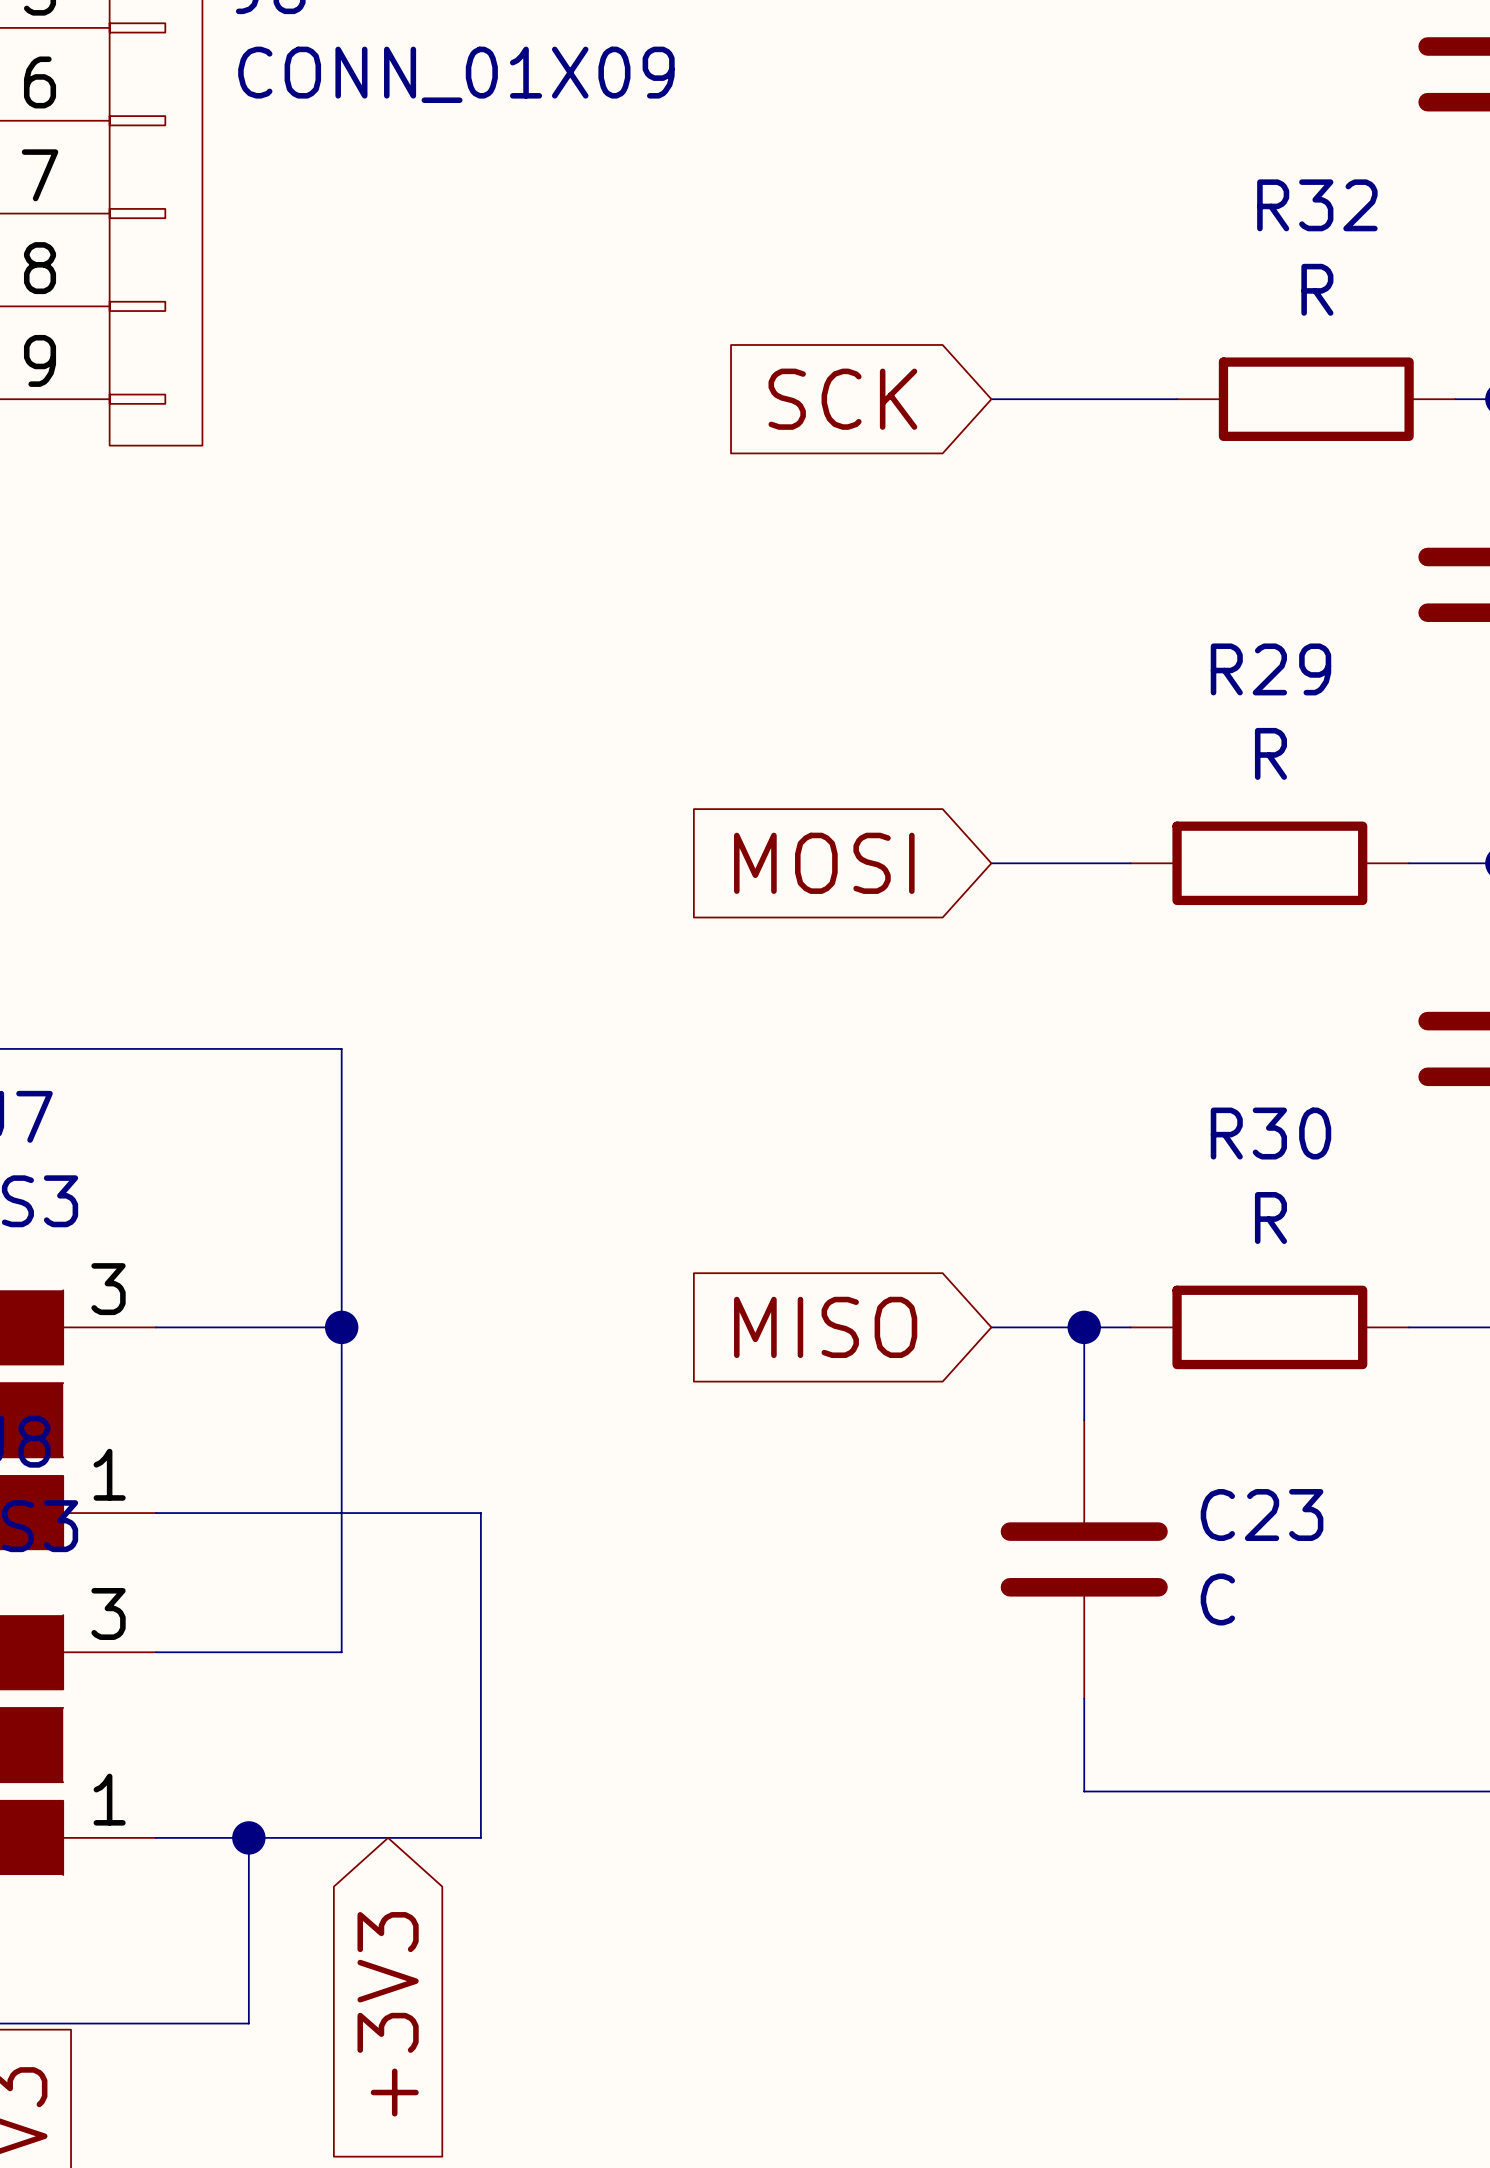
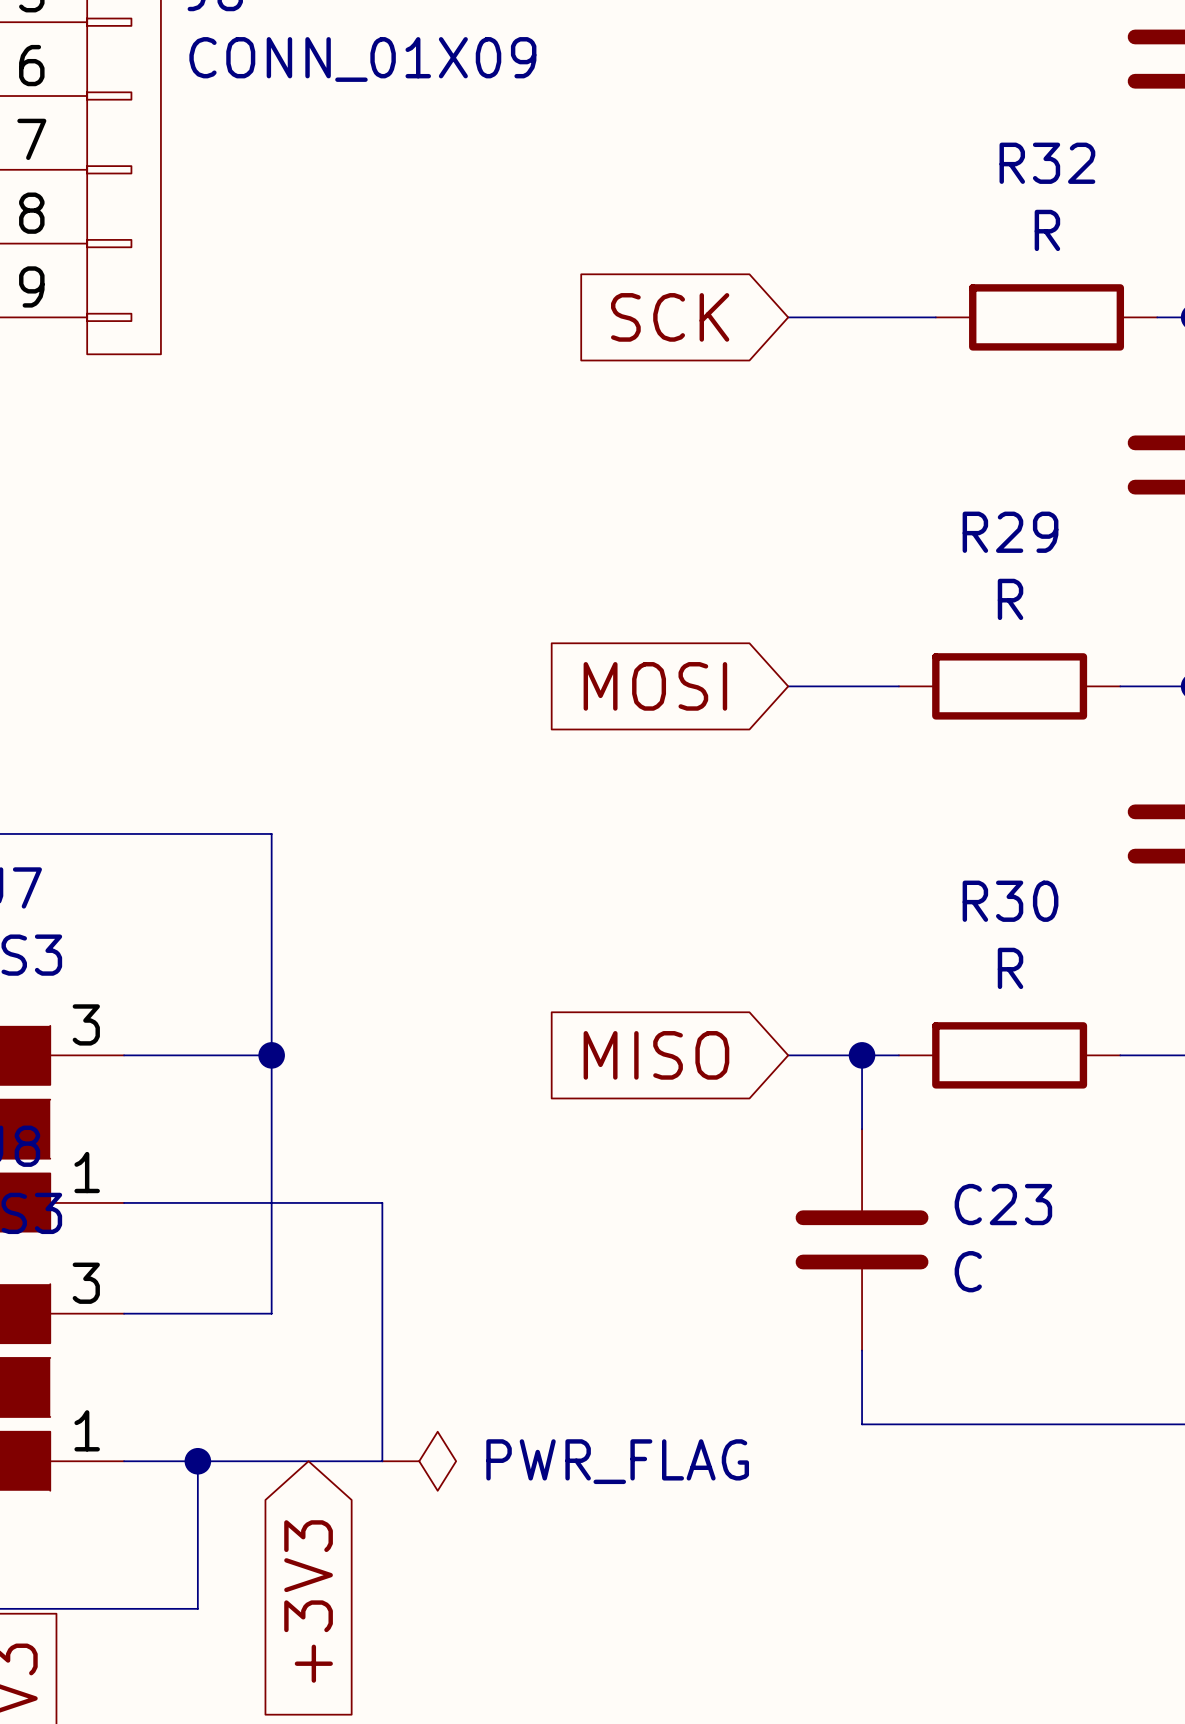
power symbol: none -> PWR_FLAG (419, 1461)

